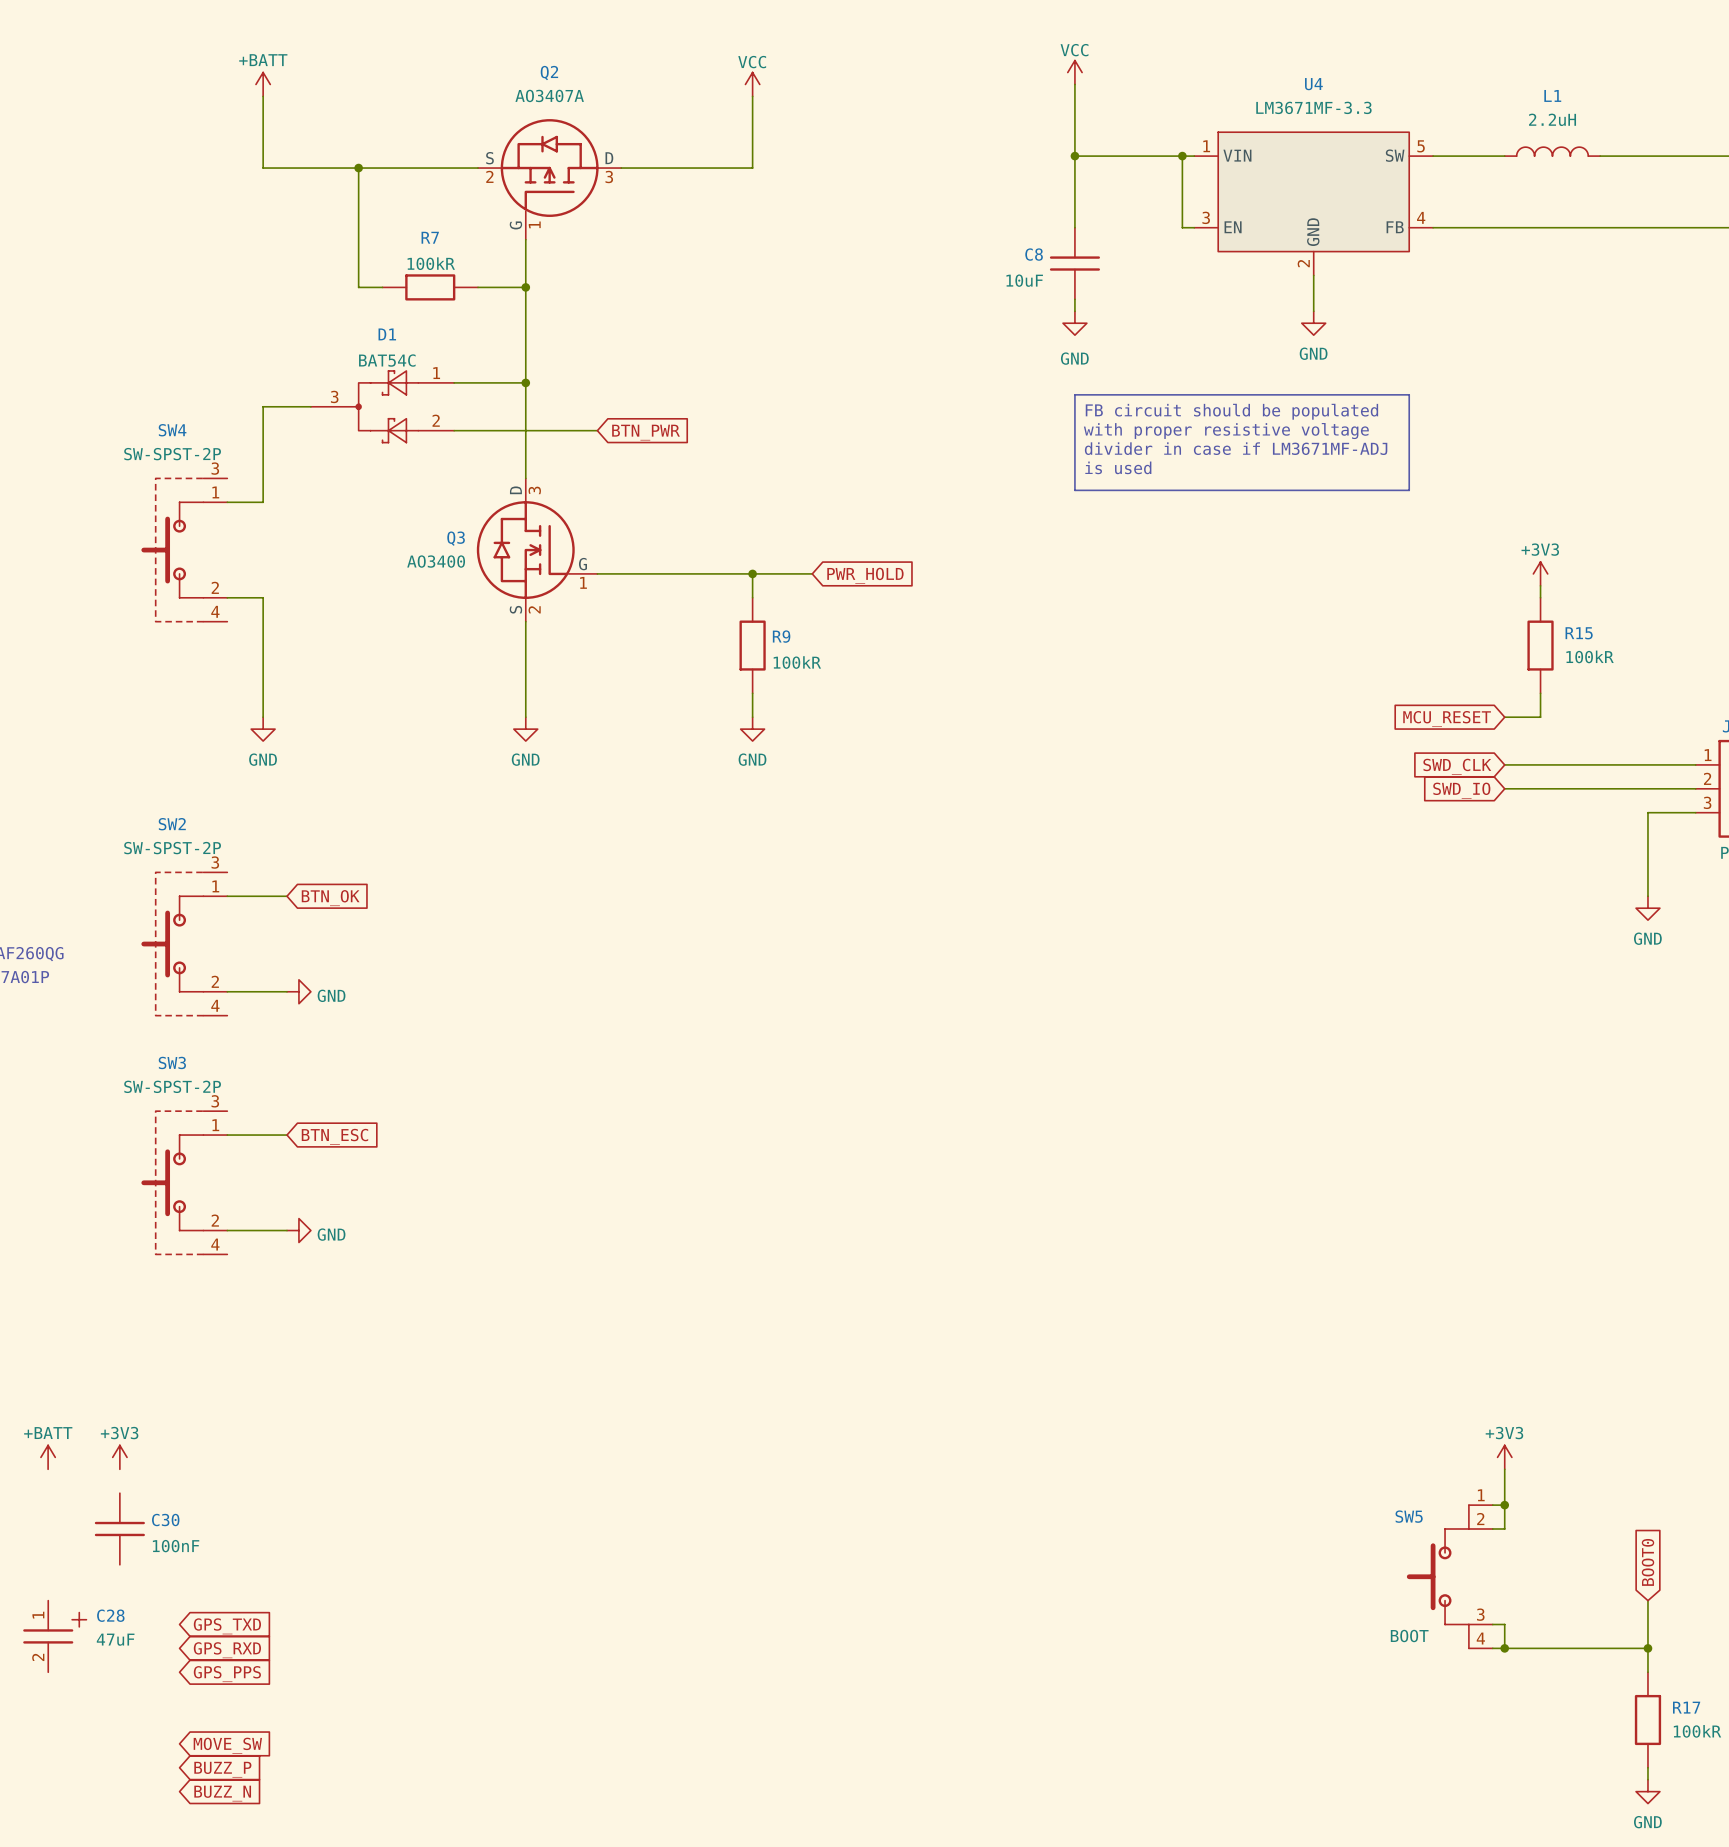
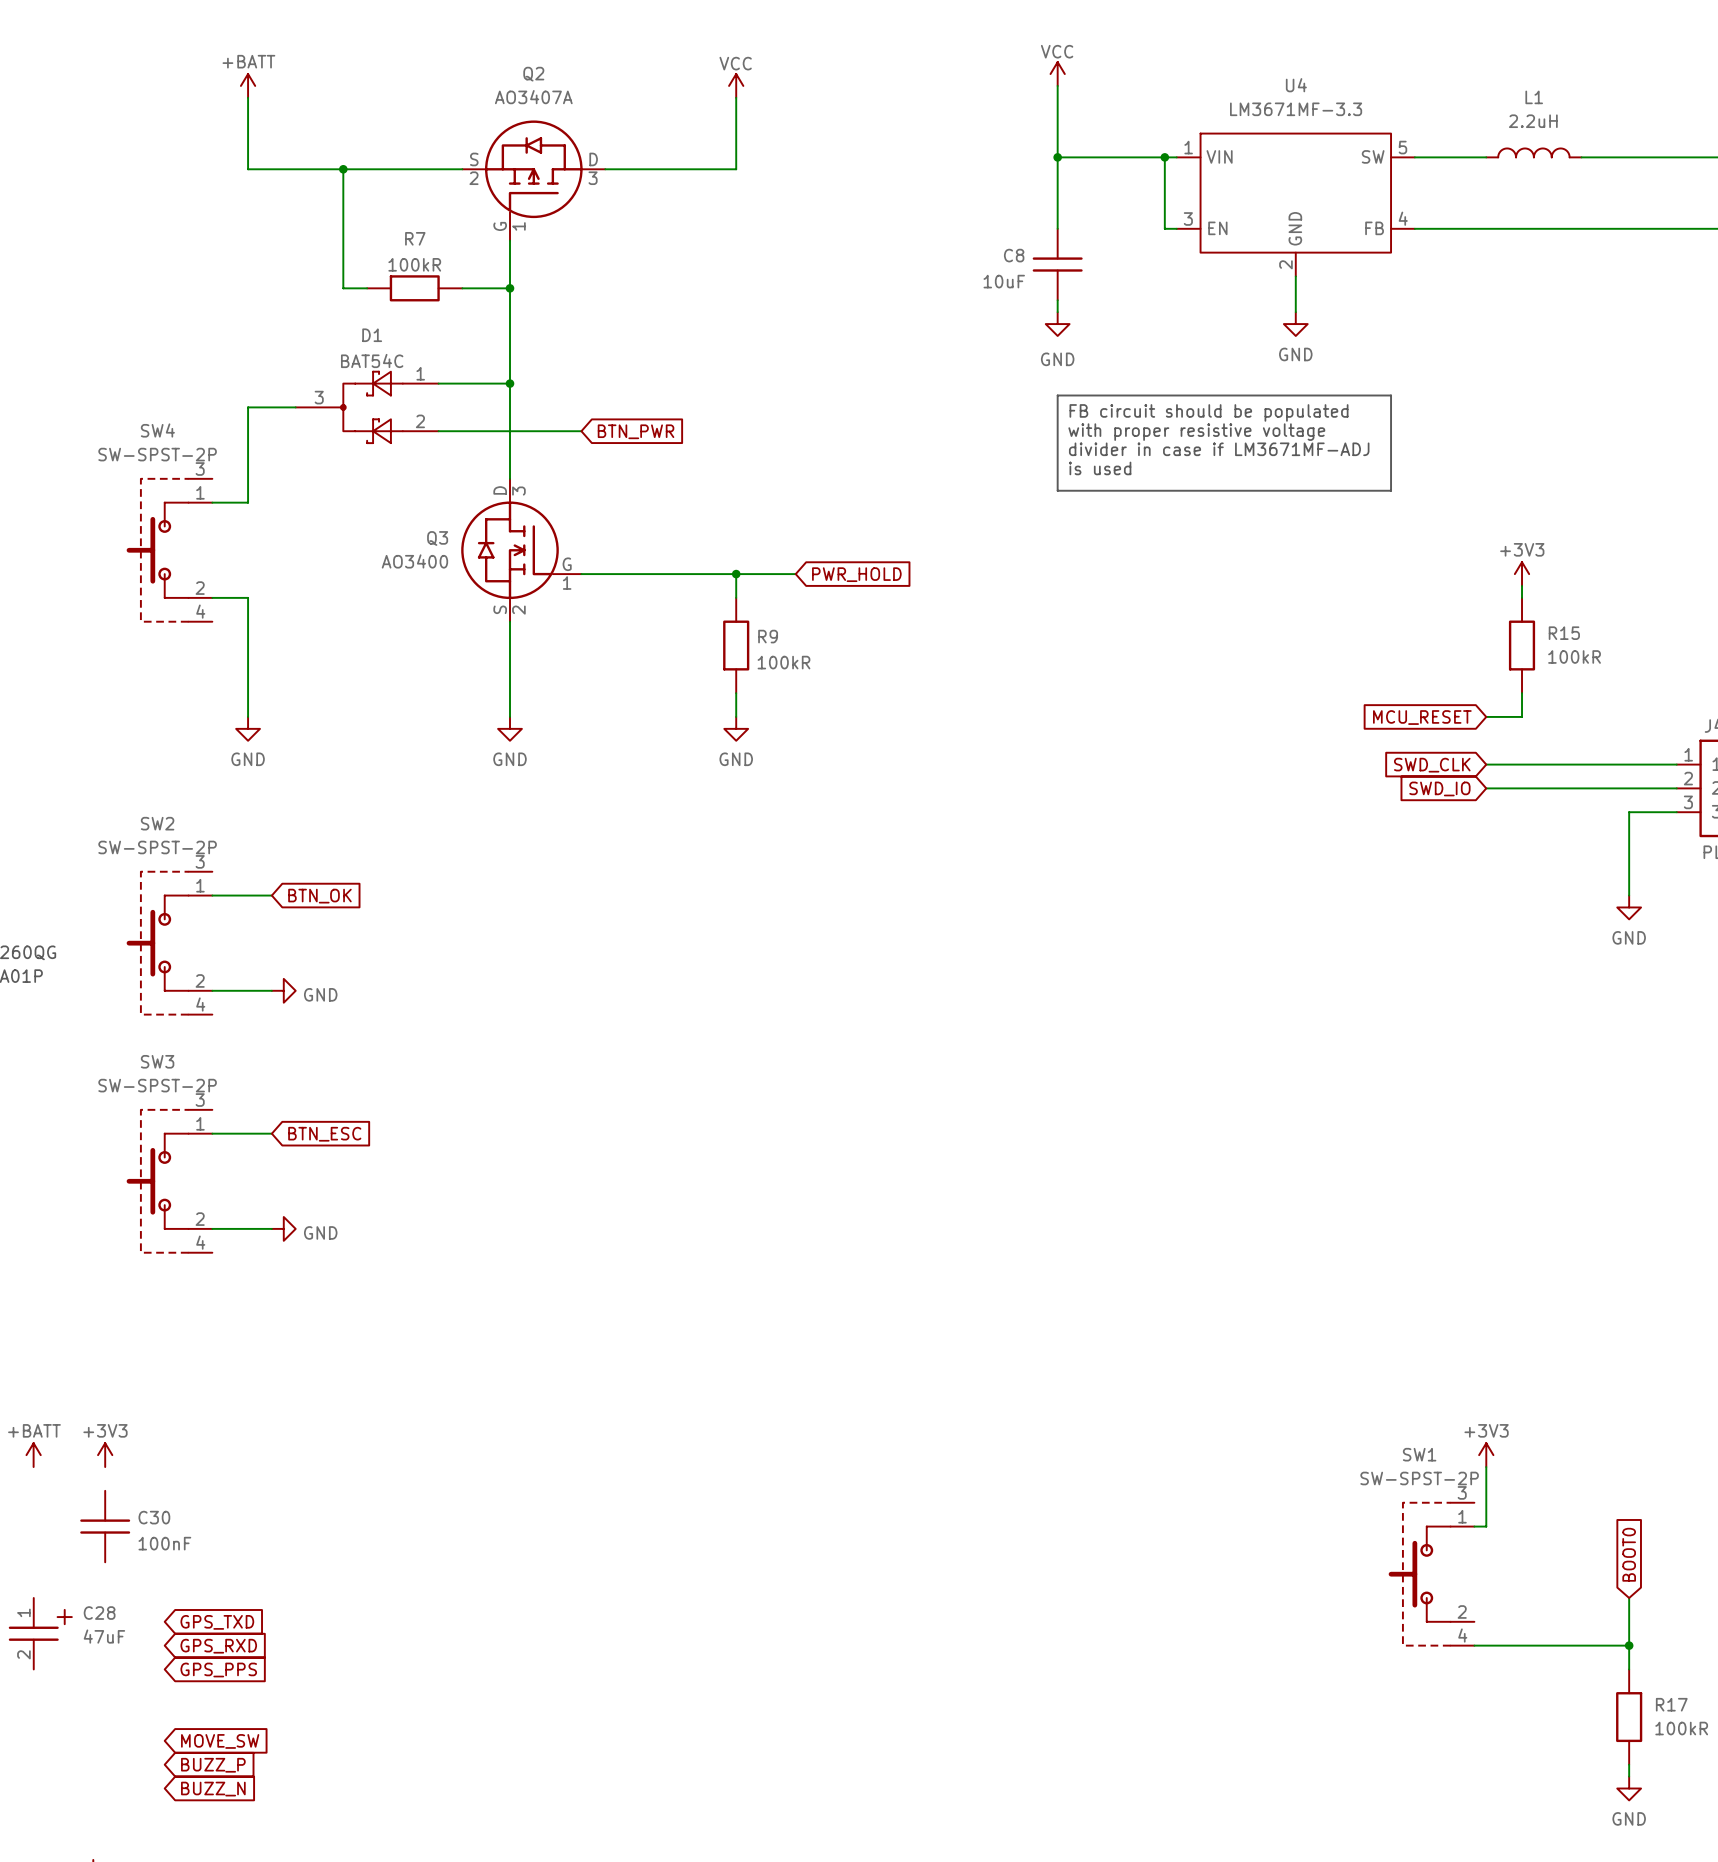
wire: (1492, 1505) (1504, 1505) -> none
junction: (1504, 1505) -> none
SW5: (1449, 1576) -> none
SW1: none -> SW-SPST-2P (1431, 1574)
wire: (1492, 1624) (1504, 1624) (1504, 1648) -> none
junction: (1504, 1648) -> none

